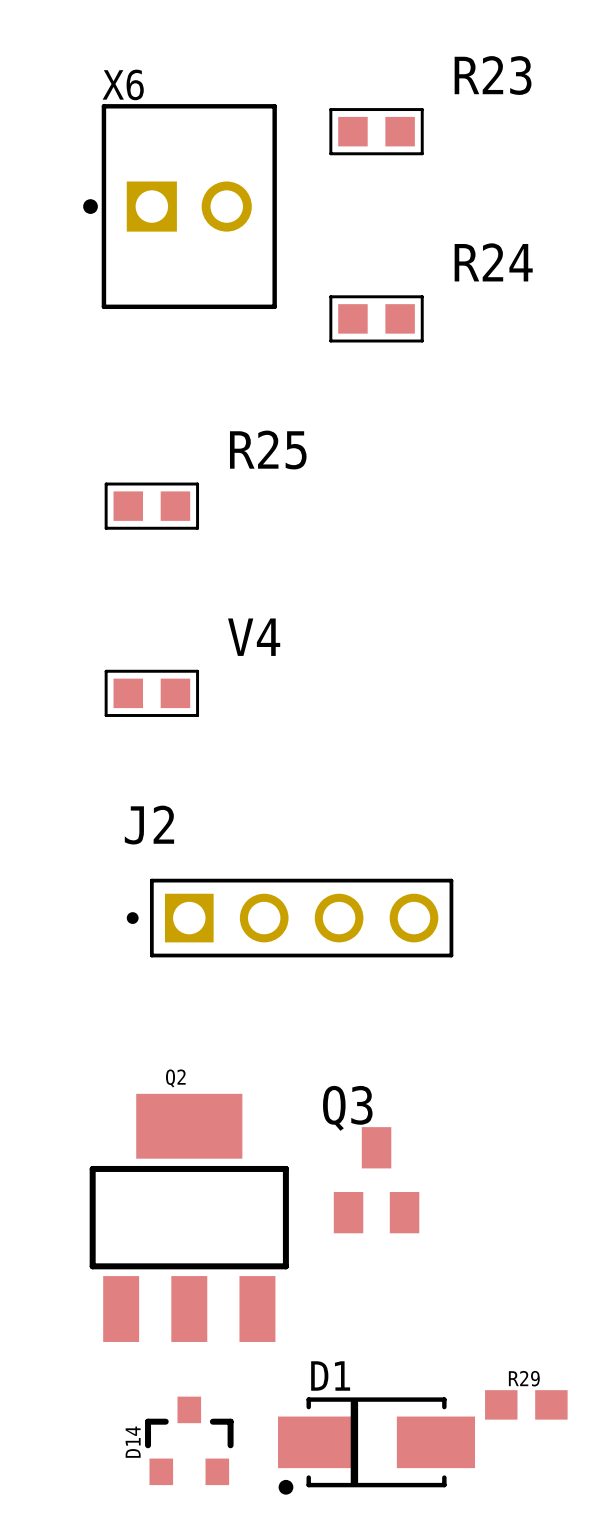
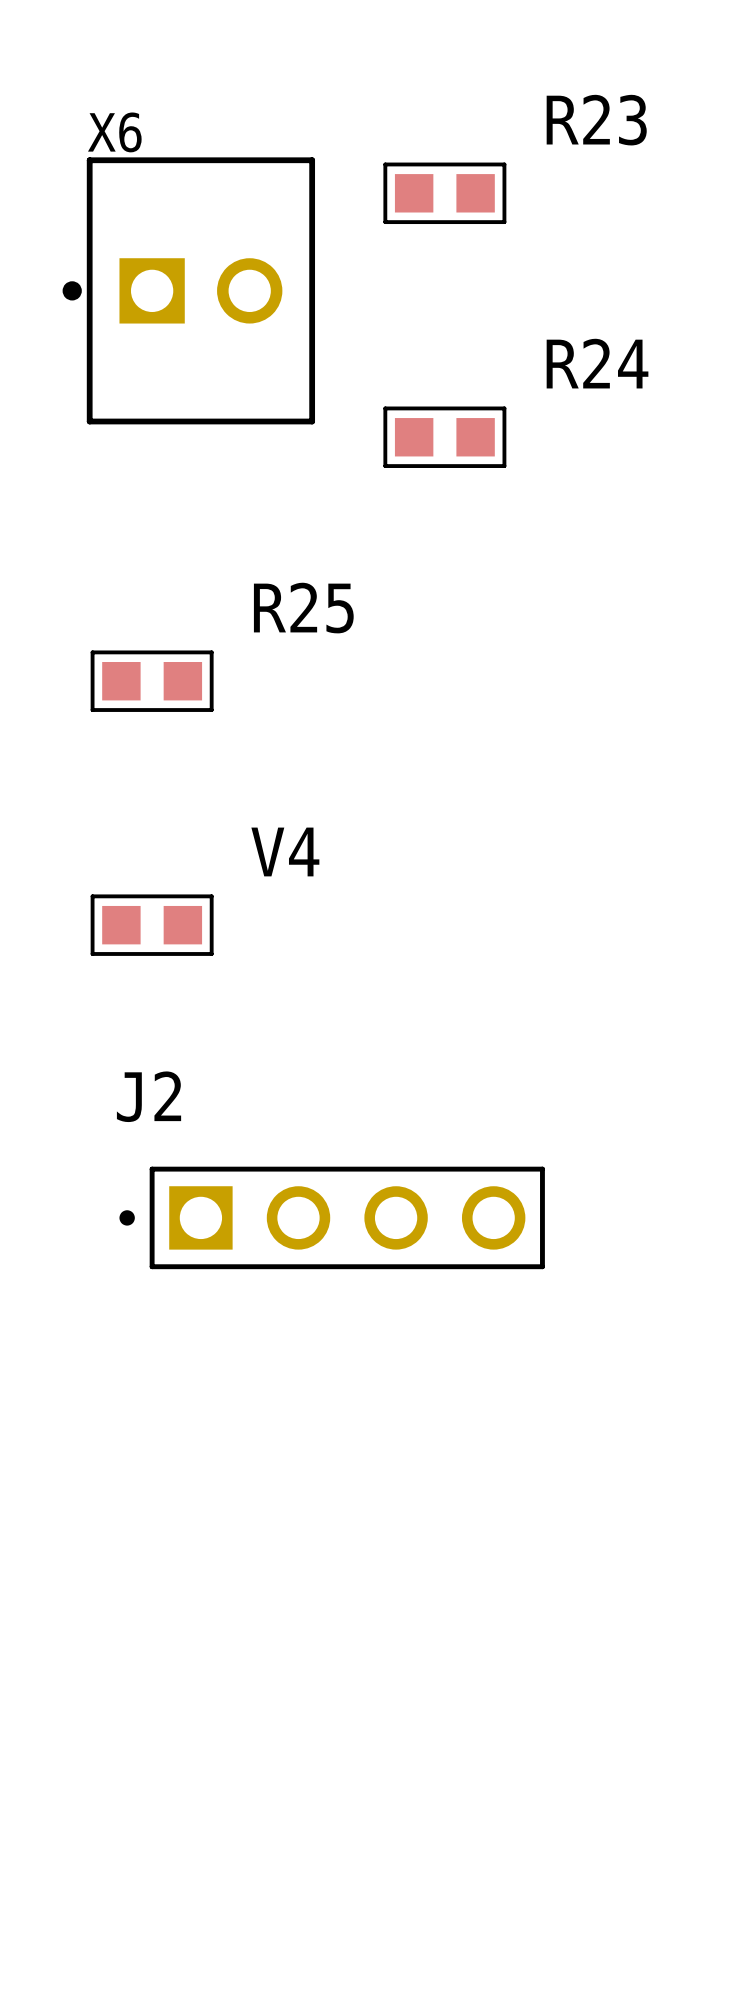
Q3: (376, 1180) -> none
Q2: (189, 1217) -> none
R29: (526, 1404) -> none
D14: (189, 1440) -> none
D1: (376, 1446) -> none

